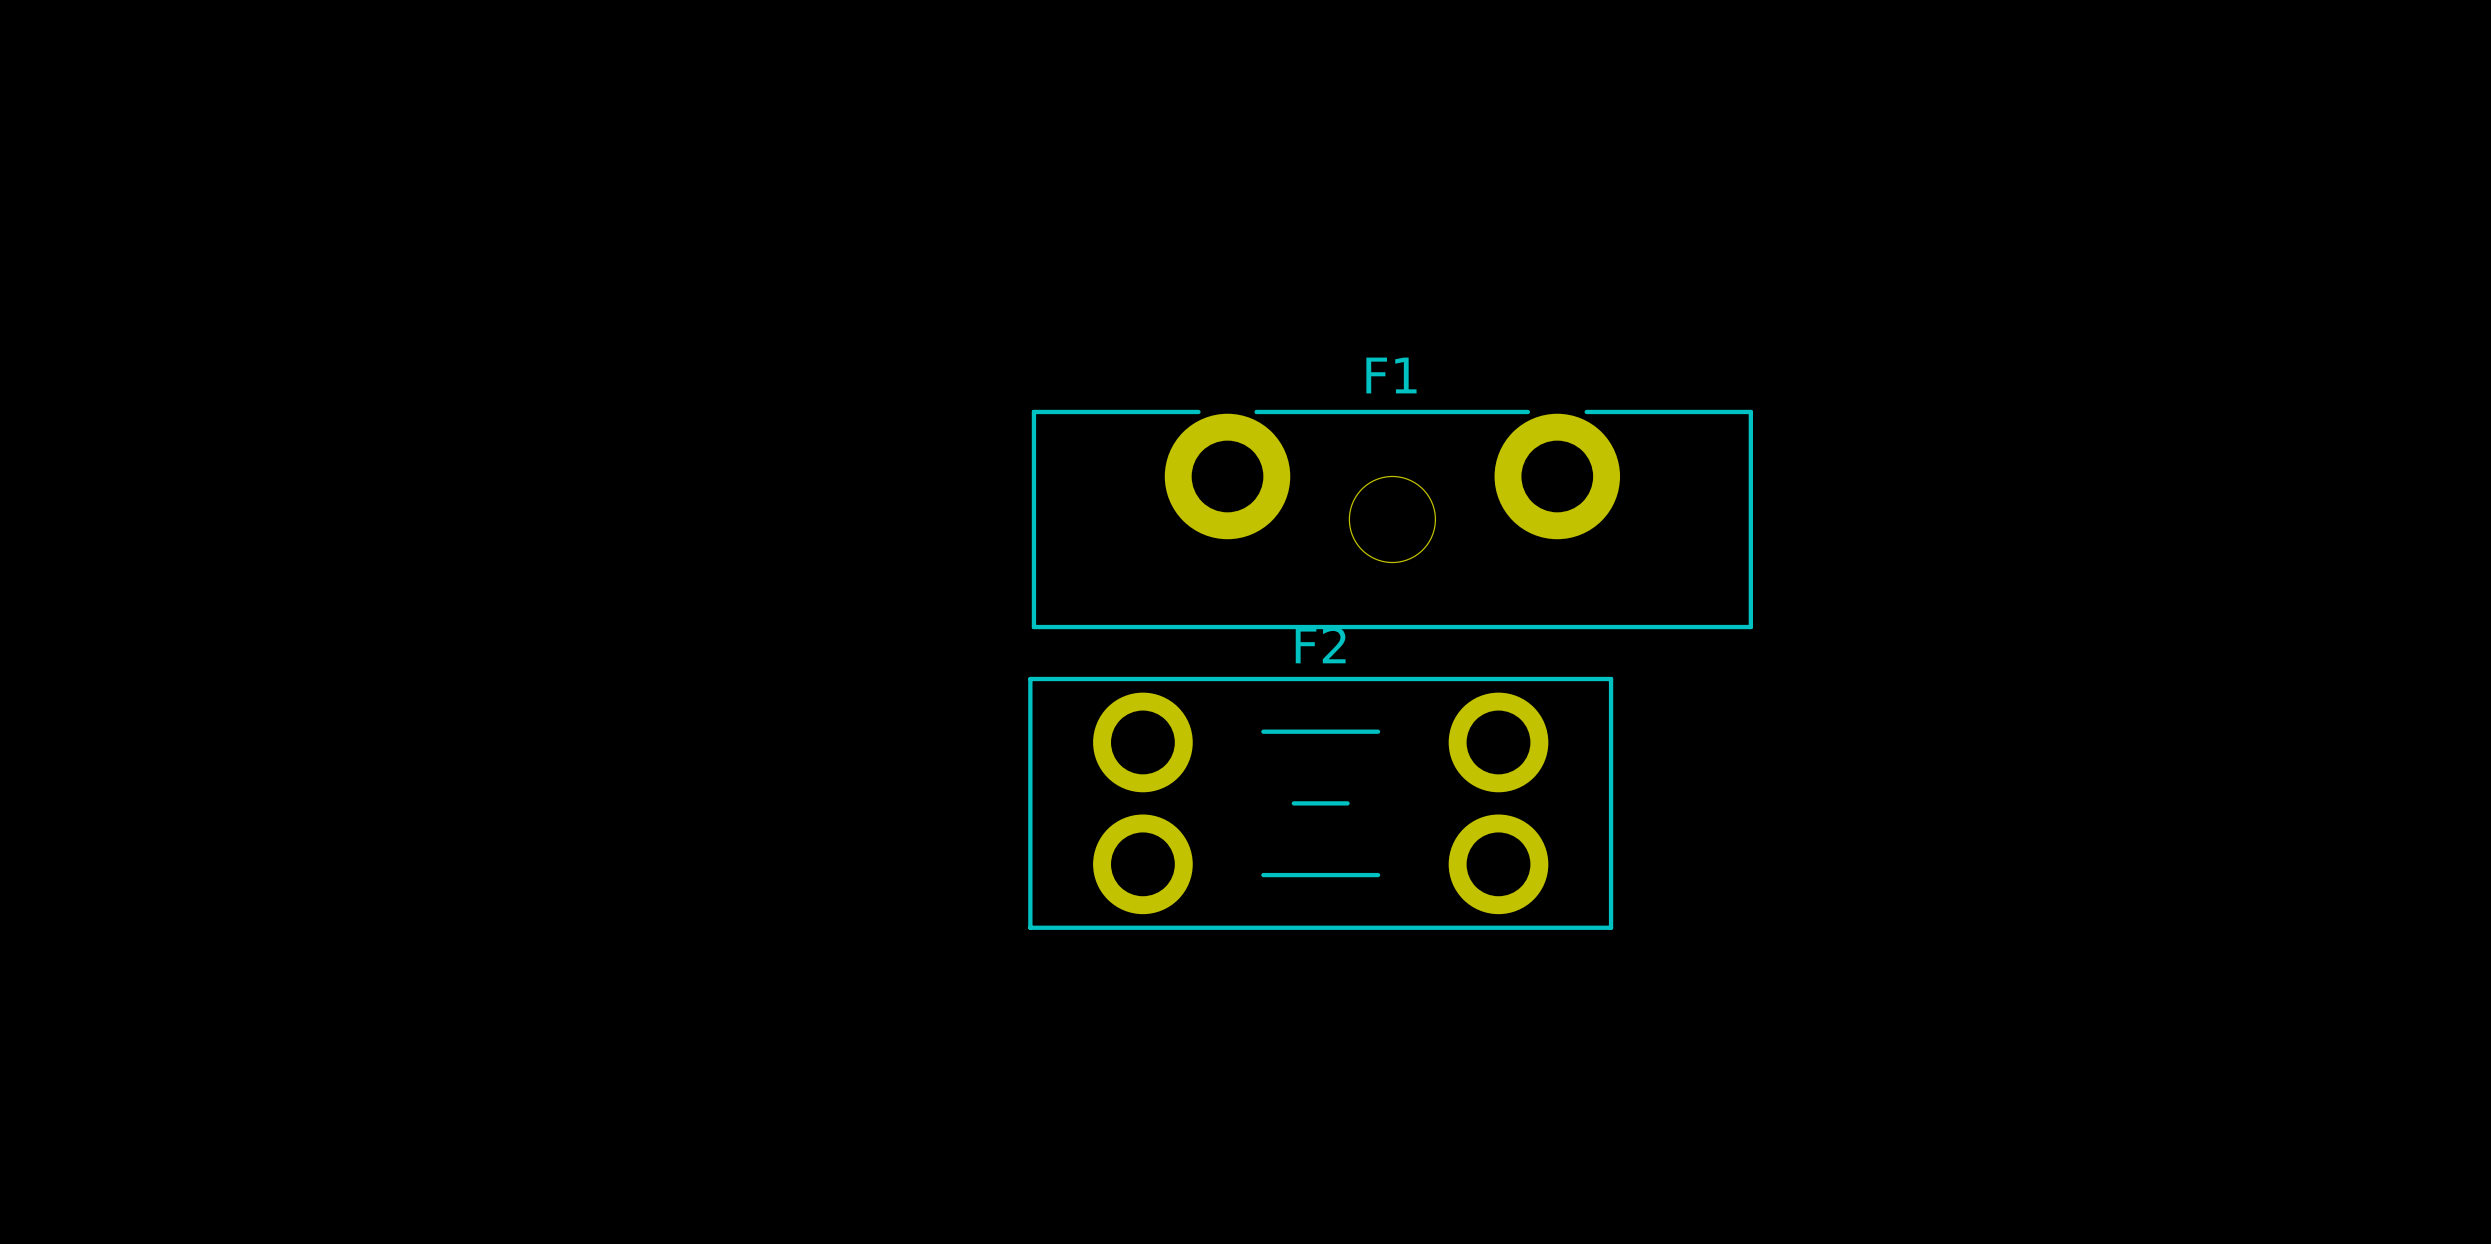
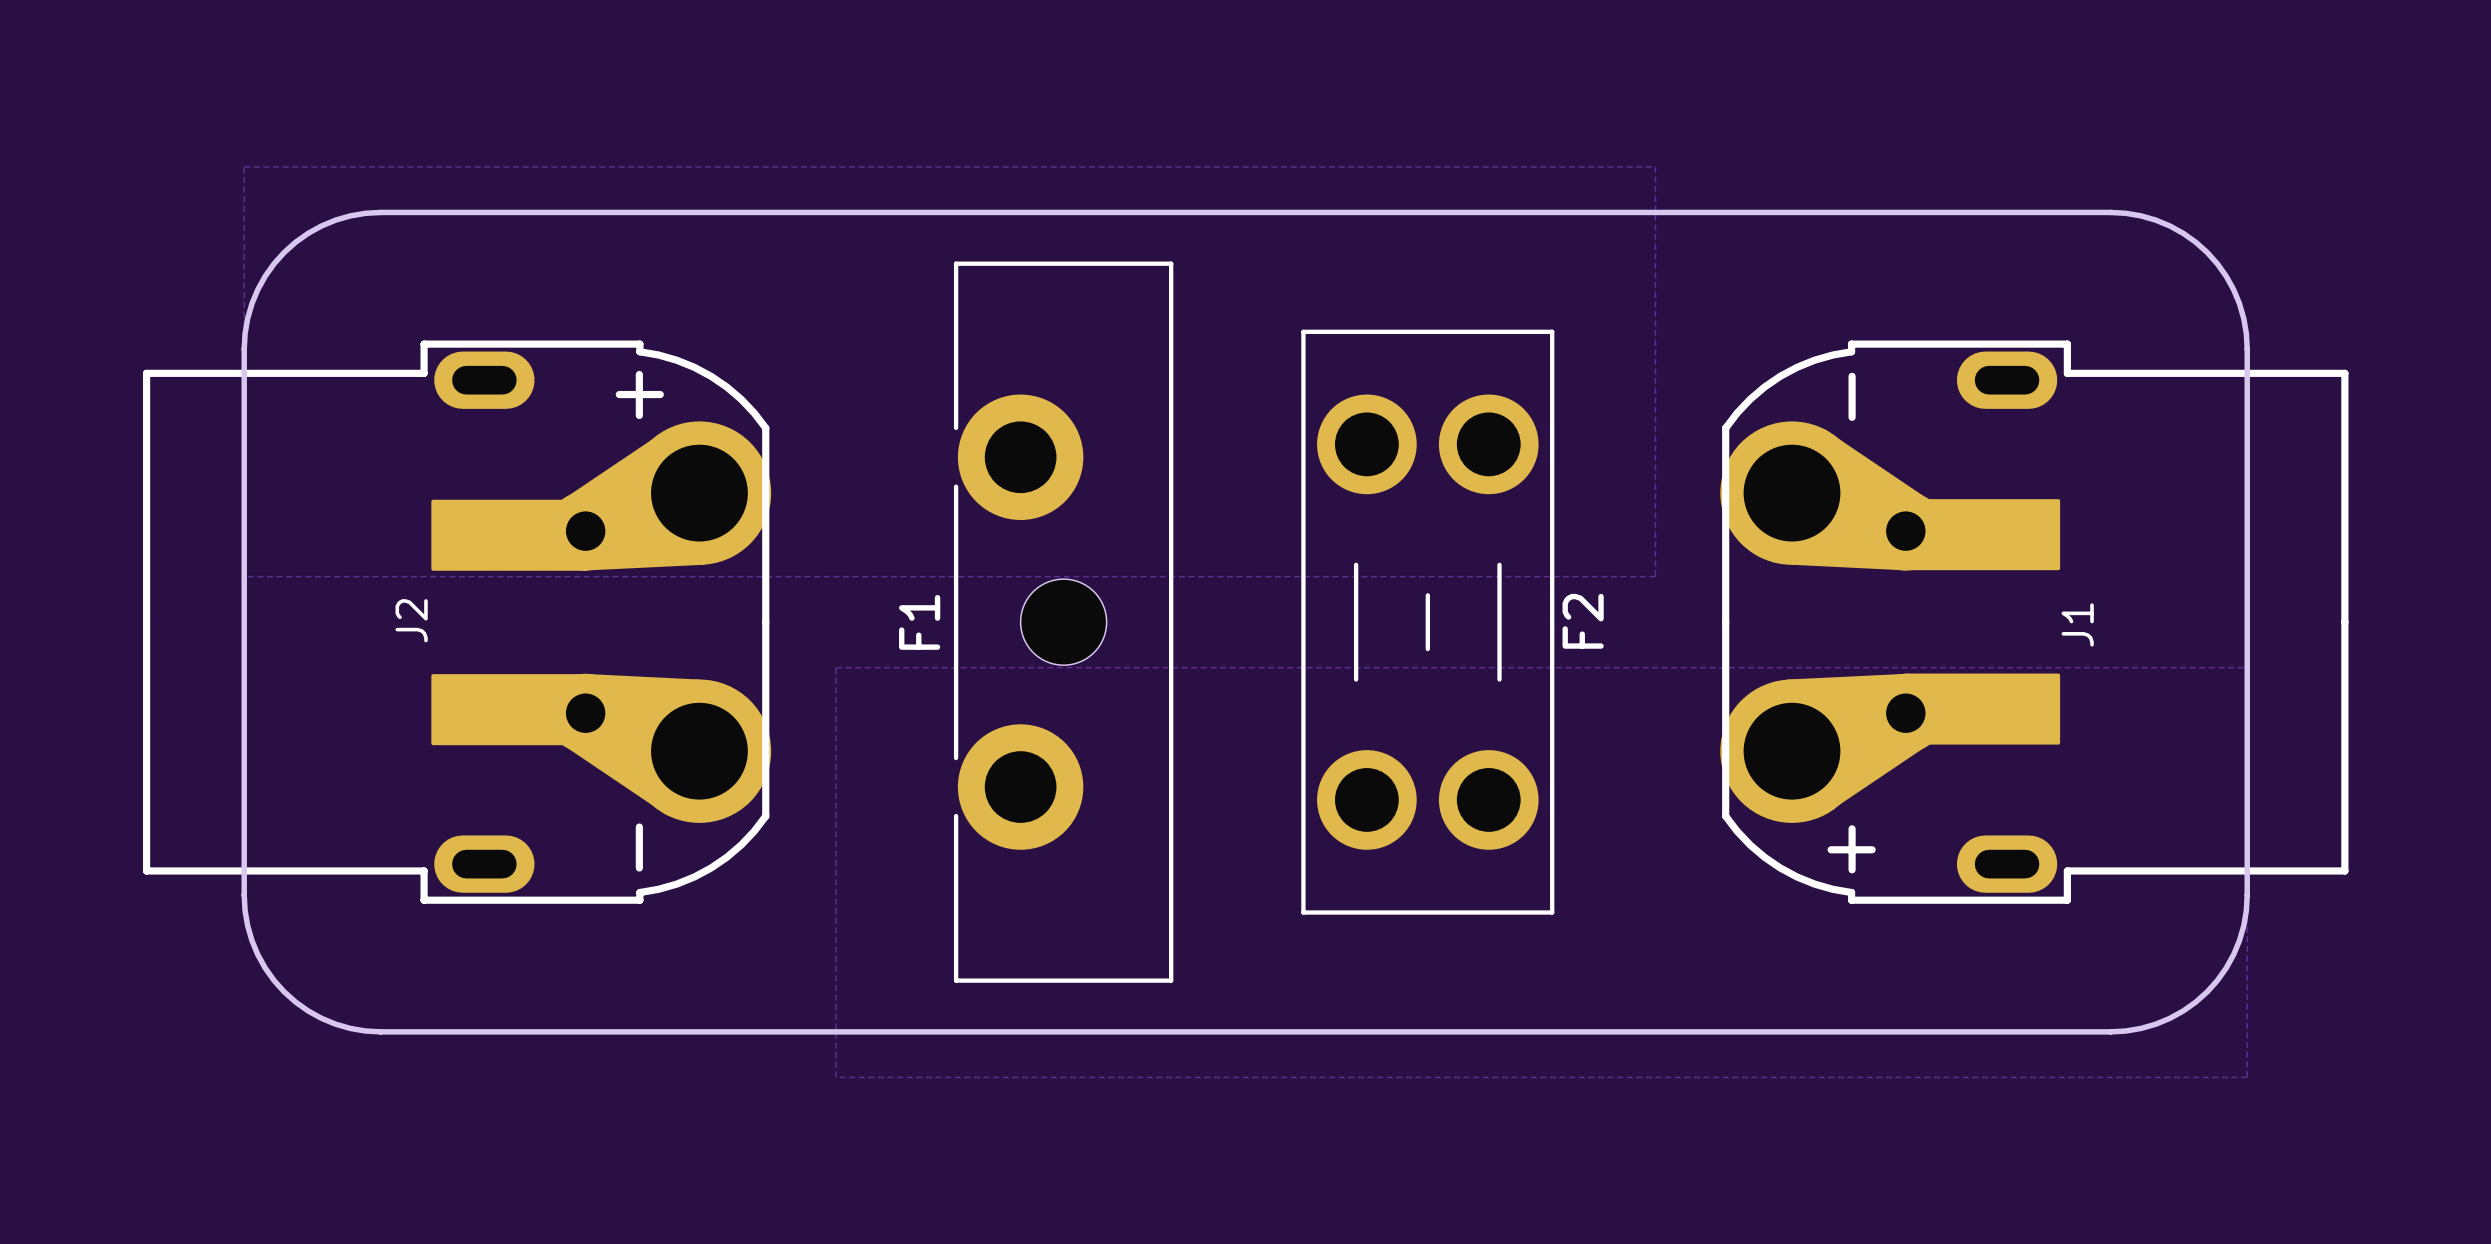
zone outline: none -> (244, 166) (244, 576) (1655, 576) (1655, 166) (244, 166)
board edge: none -> (380, 212) (2110, 212) (2125, 213) (2155, 220) (2183, 233) (2195, 242) (2217, 263) (2226, 276) (2239, 303) (2246, 333) (2247, 895) (2246, 910) (2239, 940) (2233, 954) (2217, 980) (2207, 991) (2183, 1010) (2155, 1024) (2141, 1028) (2110, 1031) (380, 1031) (350, 1028) (335, 1024) (321, 1018) (295, 1002) (274, 980) (257, 954) (247, 925) (245, 910) (244, 349) (247, 318) (257, 289) (265, 276) (284, 252) (295, 242) (321, 225) (350, 215) (380, 212)
F1 rotation: 0° (1392, 519) -> 90° counterclockwise (1063, 622)
J2: none -> (457, 622)
J1: none -> (2034, 622)
zone outline: none -> (836, 667) (836, 1077) (2247, 1077) (2247, 667) (836, 667)
F2 rotation: 0° (1320, 803) -> 90° clockwise (1427, 622)

